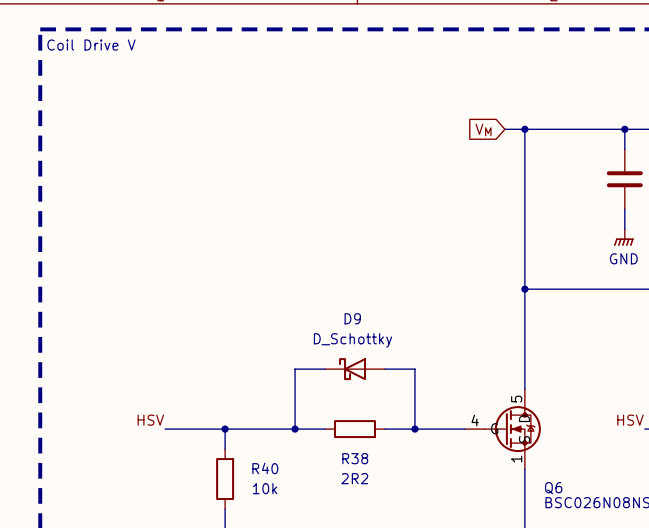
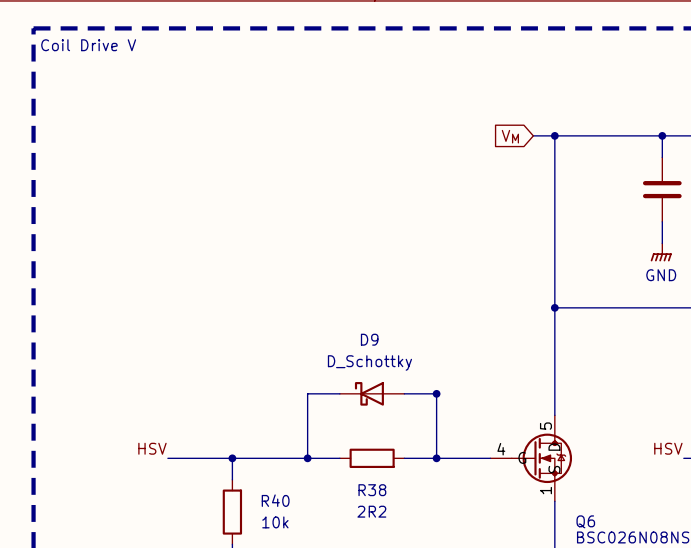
junction: none -> (436, 393)

